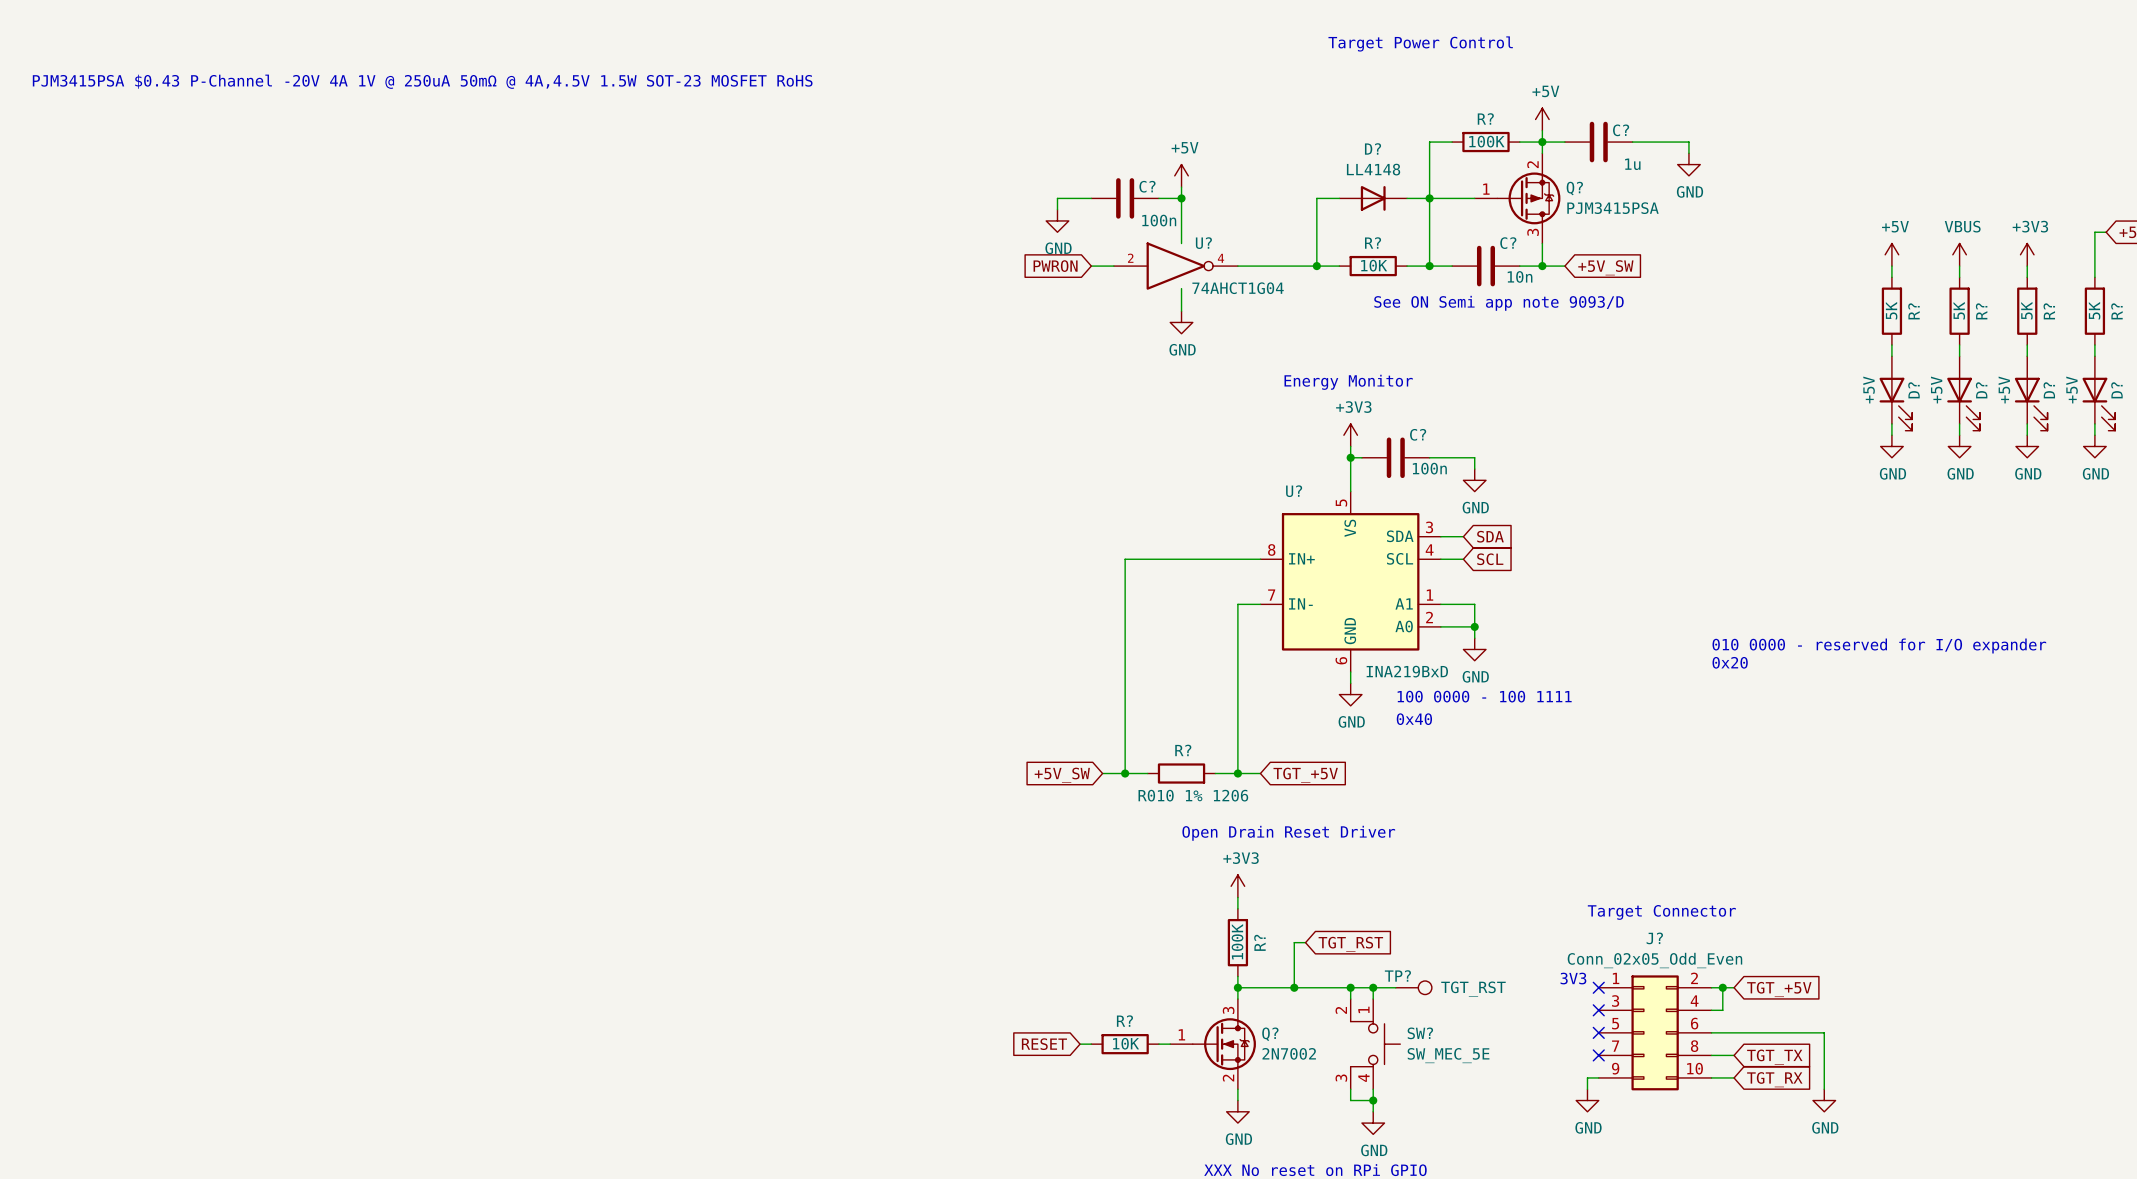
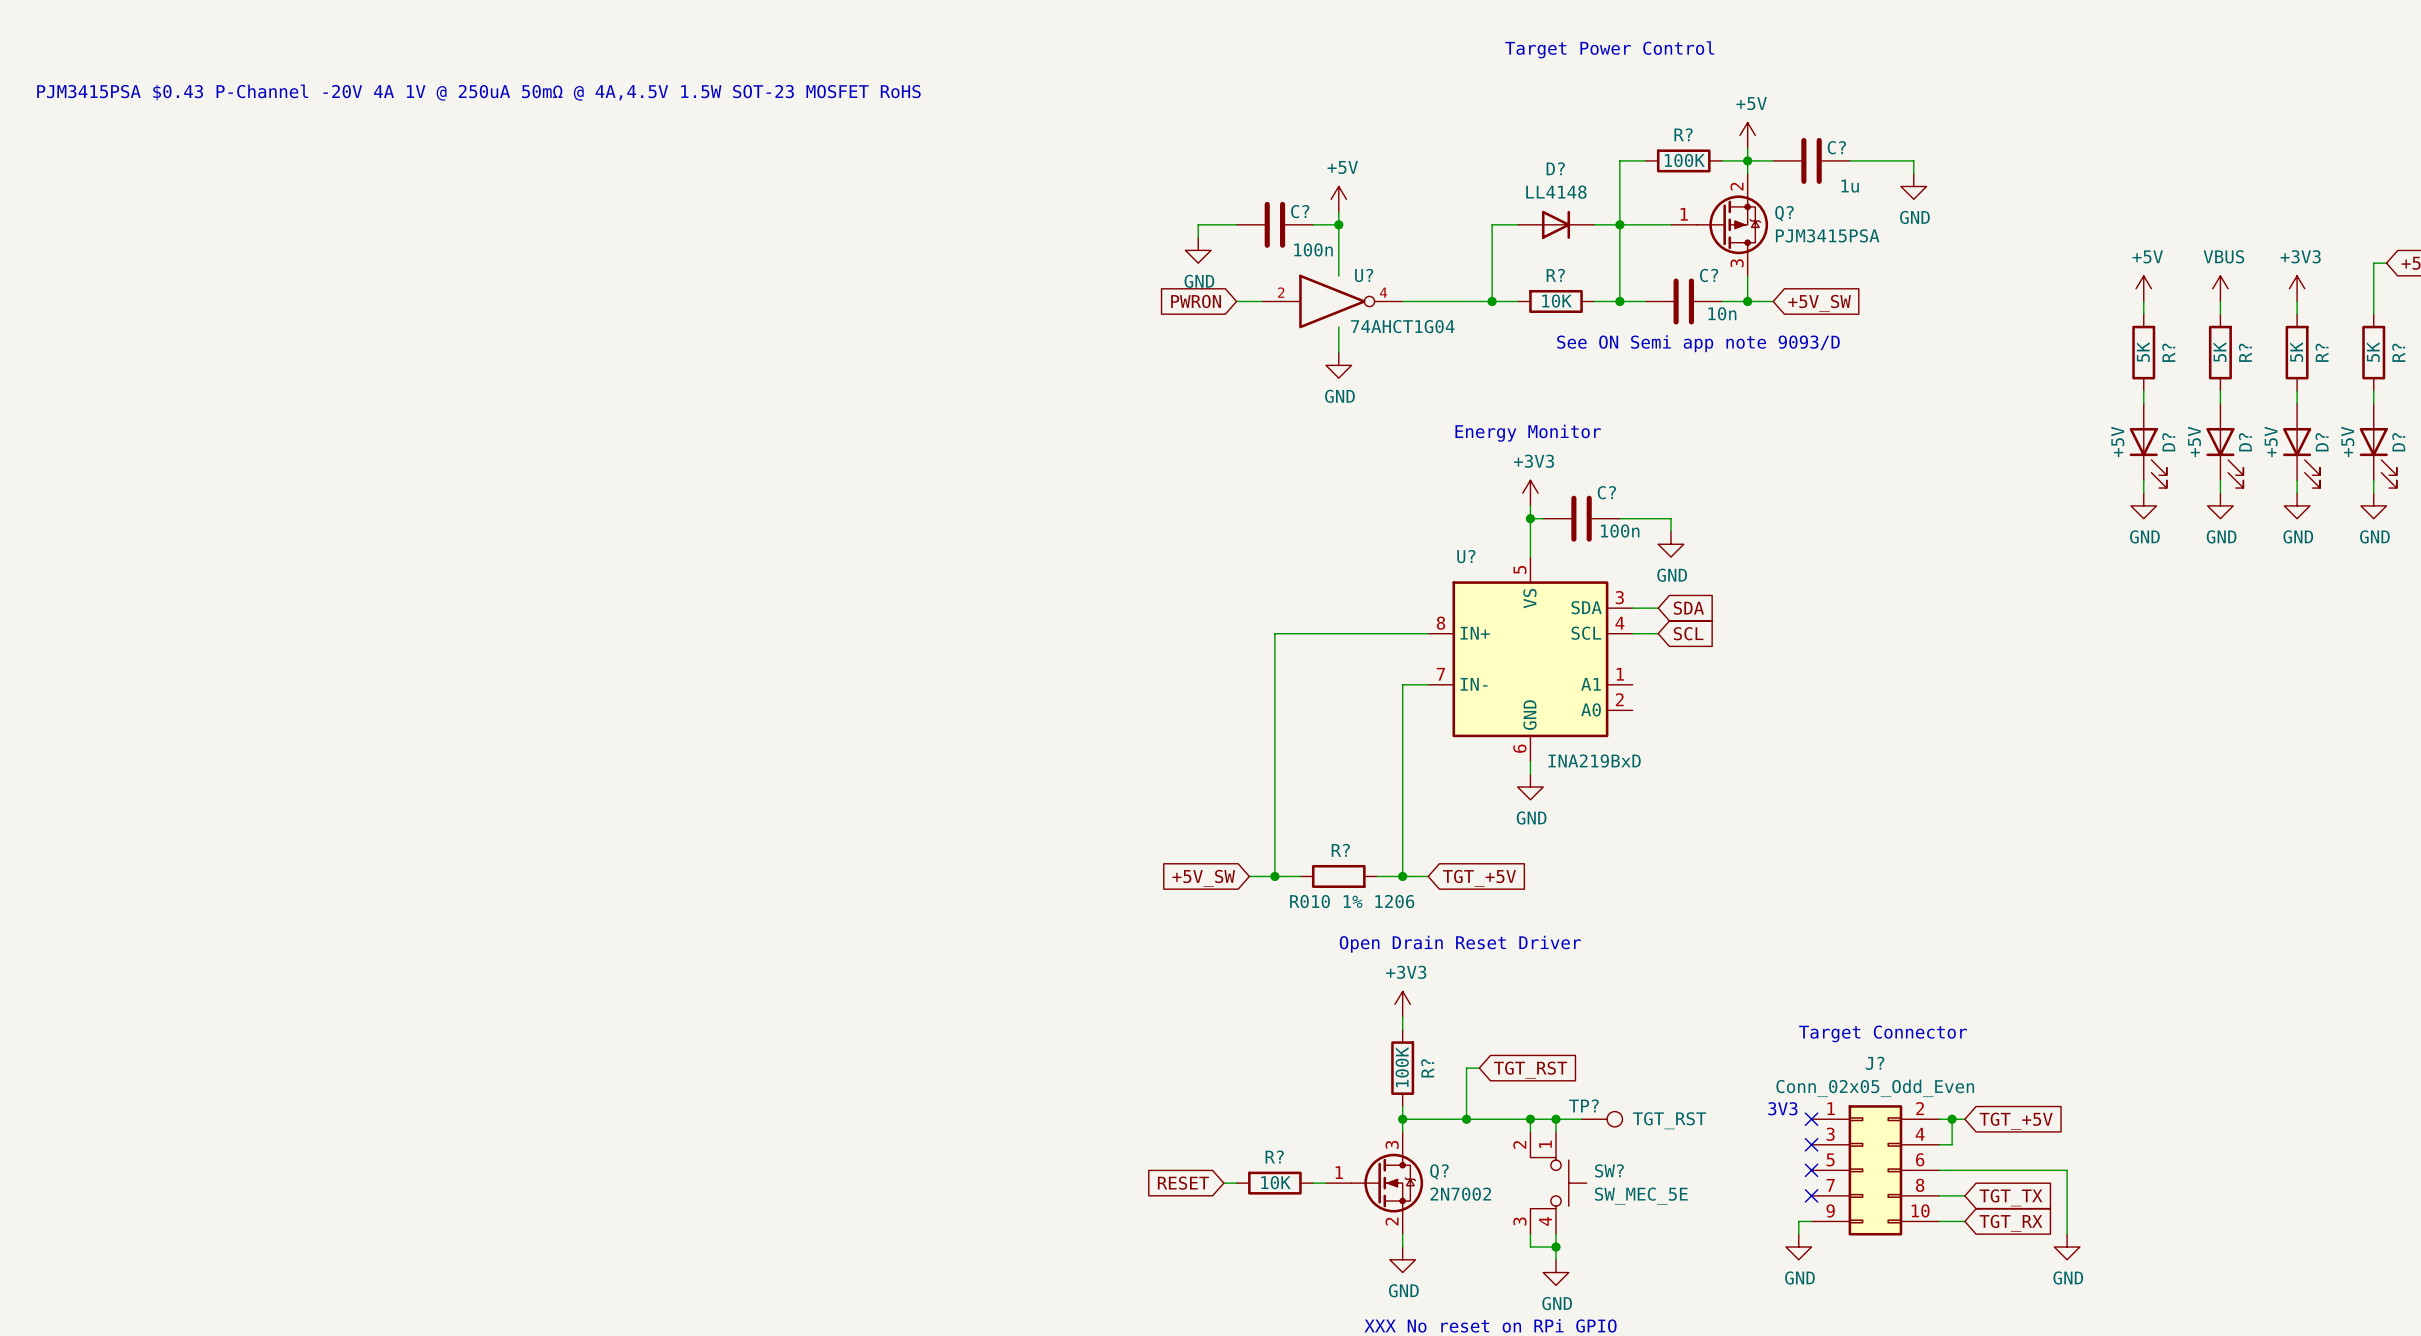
wire: (1440, 604) (1474, 604) (1474, 638) -> none
wire: (1440, 626) (1474, 626) -> none
junction: (1474, 626) -> none
text: 010 0000 - reserved for I/O expander (1879, 646) -> none
power symbol: GND (1474, 649) -> none
text: 0x20 (1730, 662) -> none
text: 100 0000 - 100 1111 (1484, 696) -> none
text: 0x40 (1414, 719) -> none

